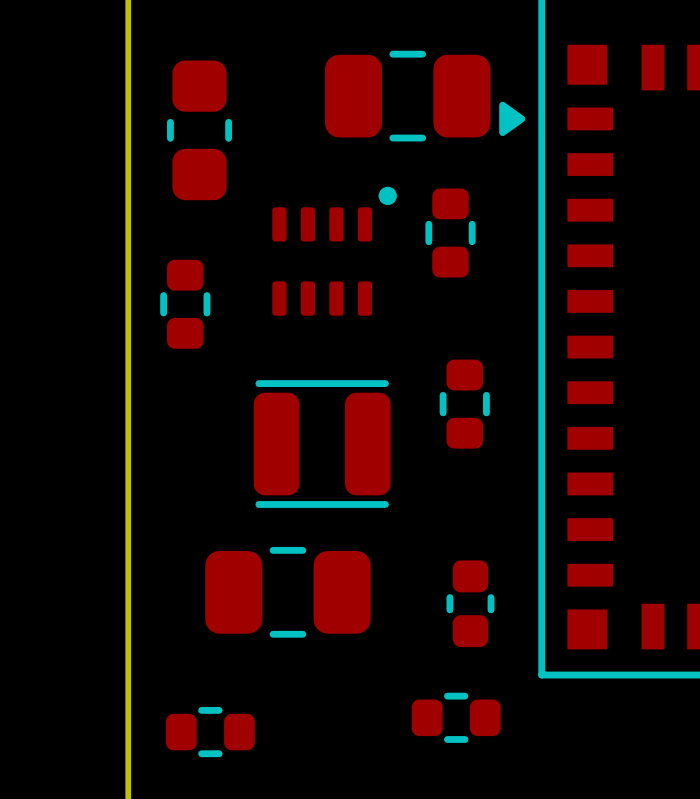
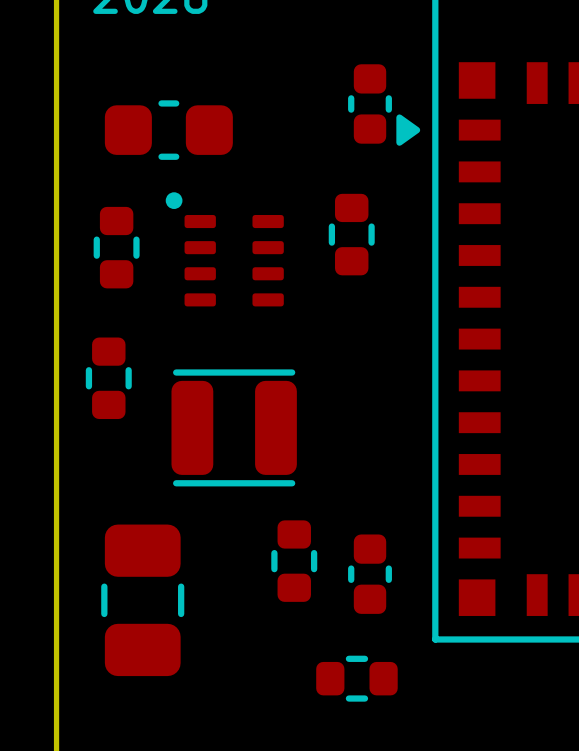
part: none -> (370, 103)
part: (407, 96) -> none
part rotation: 0° (199, 130) -> 90° clockwise (168, 130)
part: none -> (116, 247)
part rotation: 0° (334, 251) -> 90° counterclockwise (224, 249)
part: (185, 304) -> none
part: none -> (108, 378)
part: (464, 404) -> none
part: none -> (294, 561)
part rotation: 0° (287, 592) -> 90° clockwise (142, 600)
part: (210, 732) -> none

